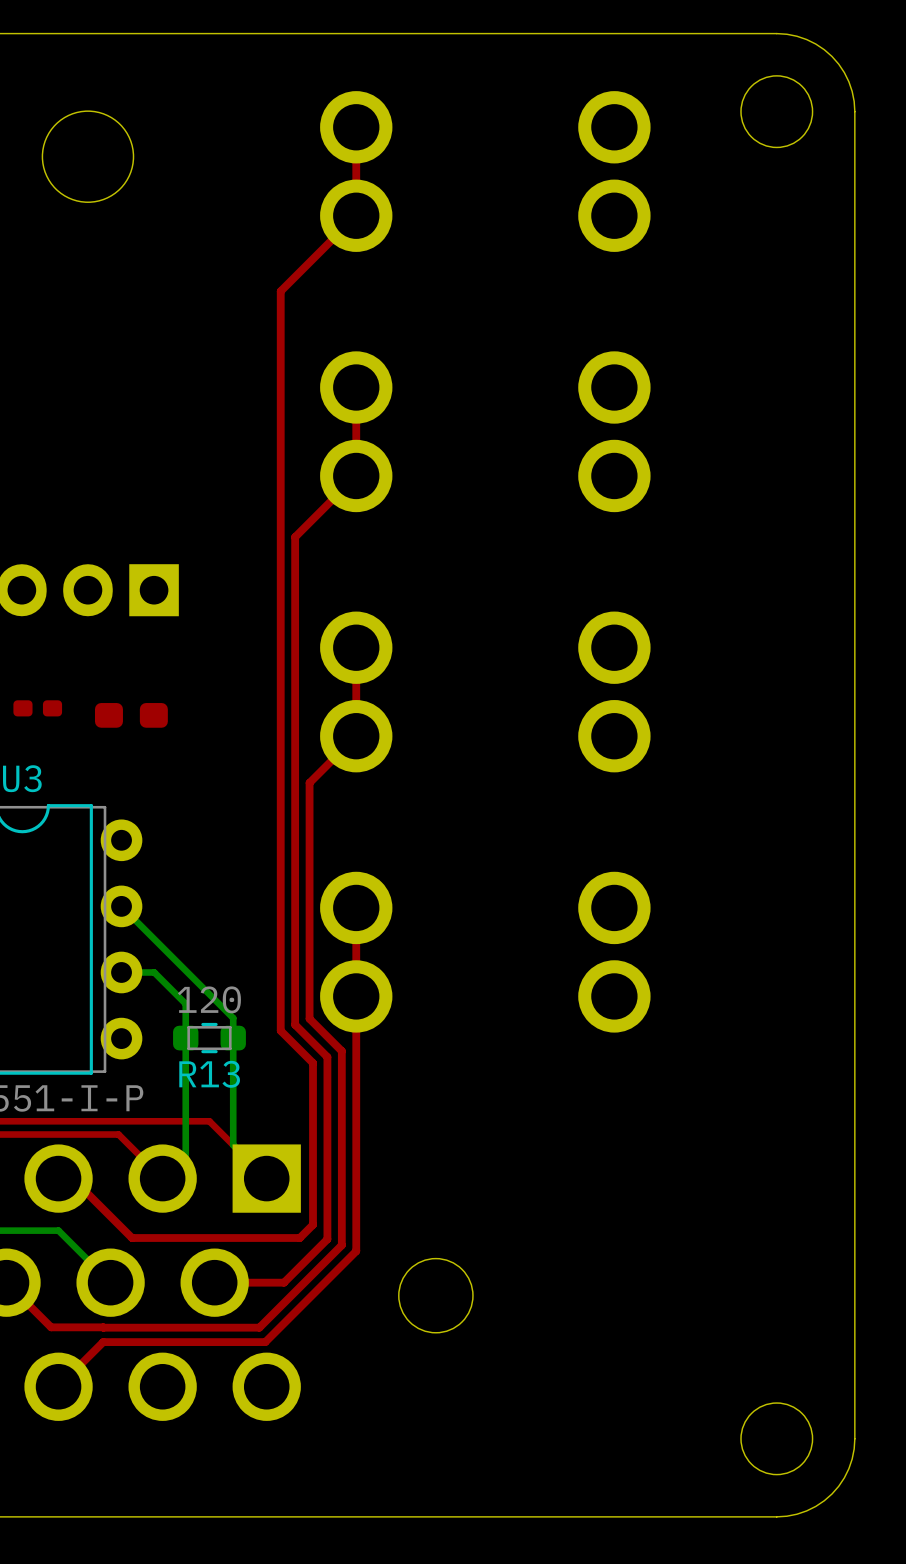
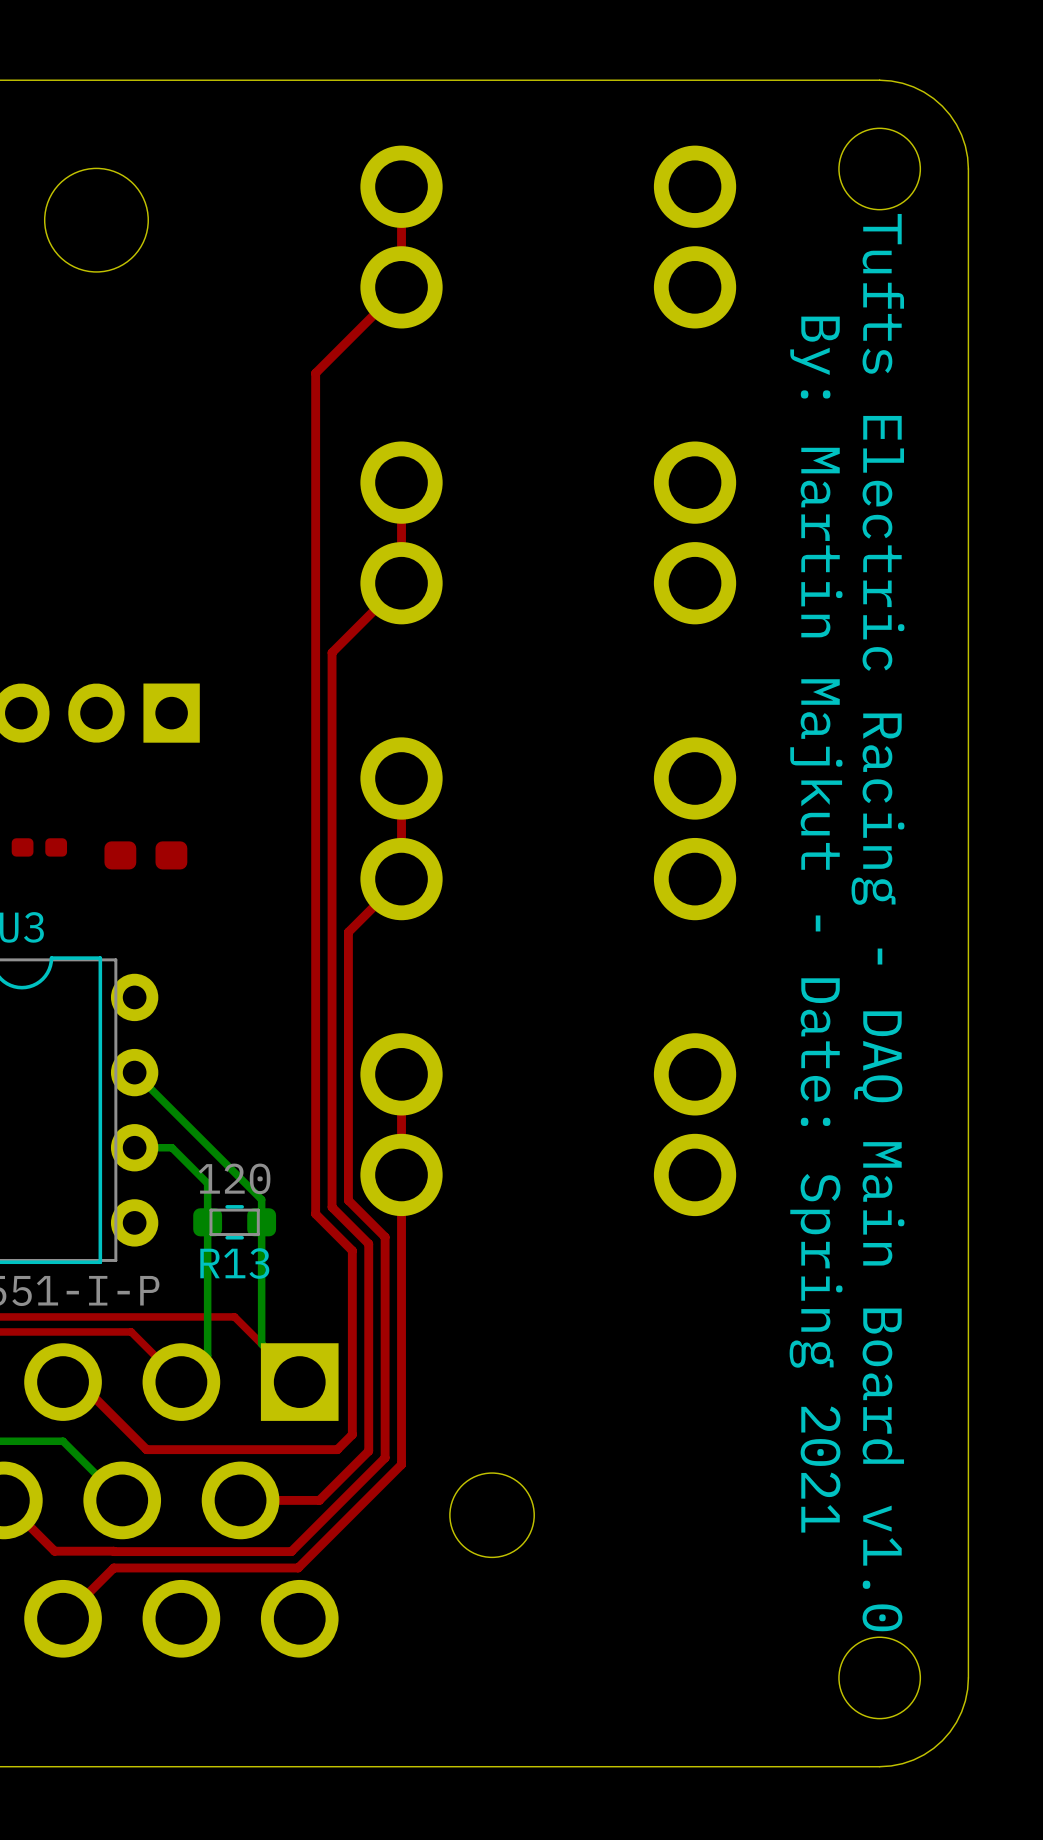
text: none -> Tufts Electric Racing - DAQ Main Board v1.0 (877, 922)
text: none -> By: Martin Majkut - Date: Spring 2021 (816, 924)

